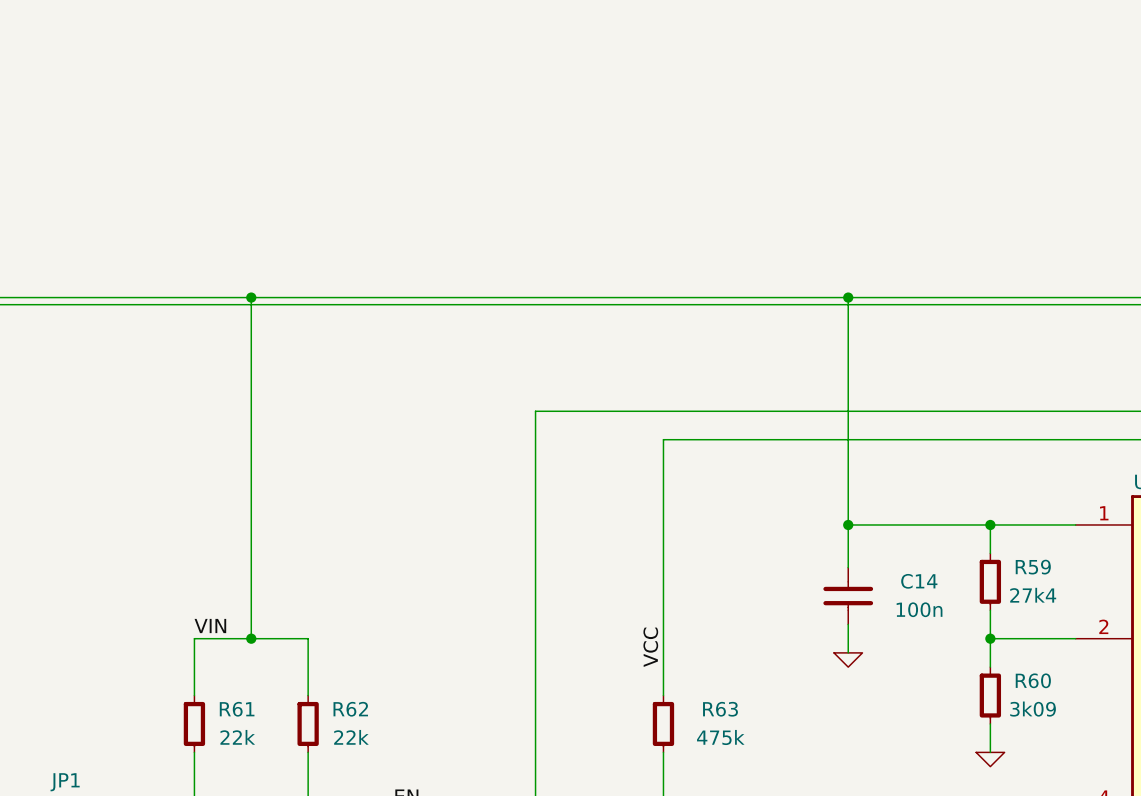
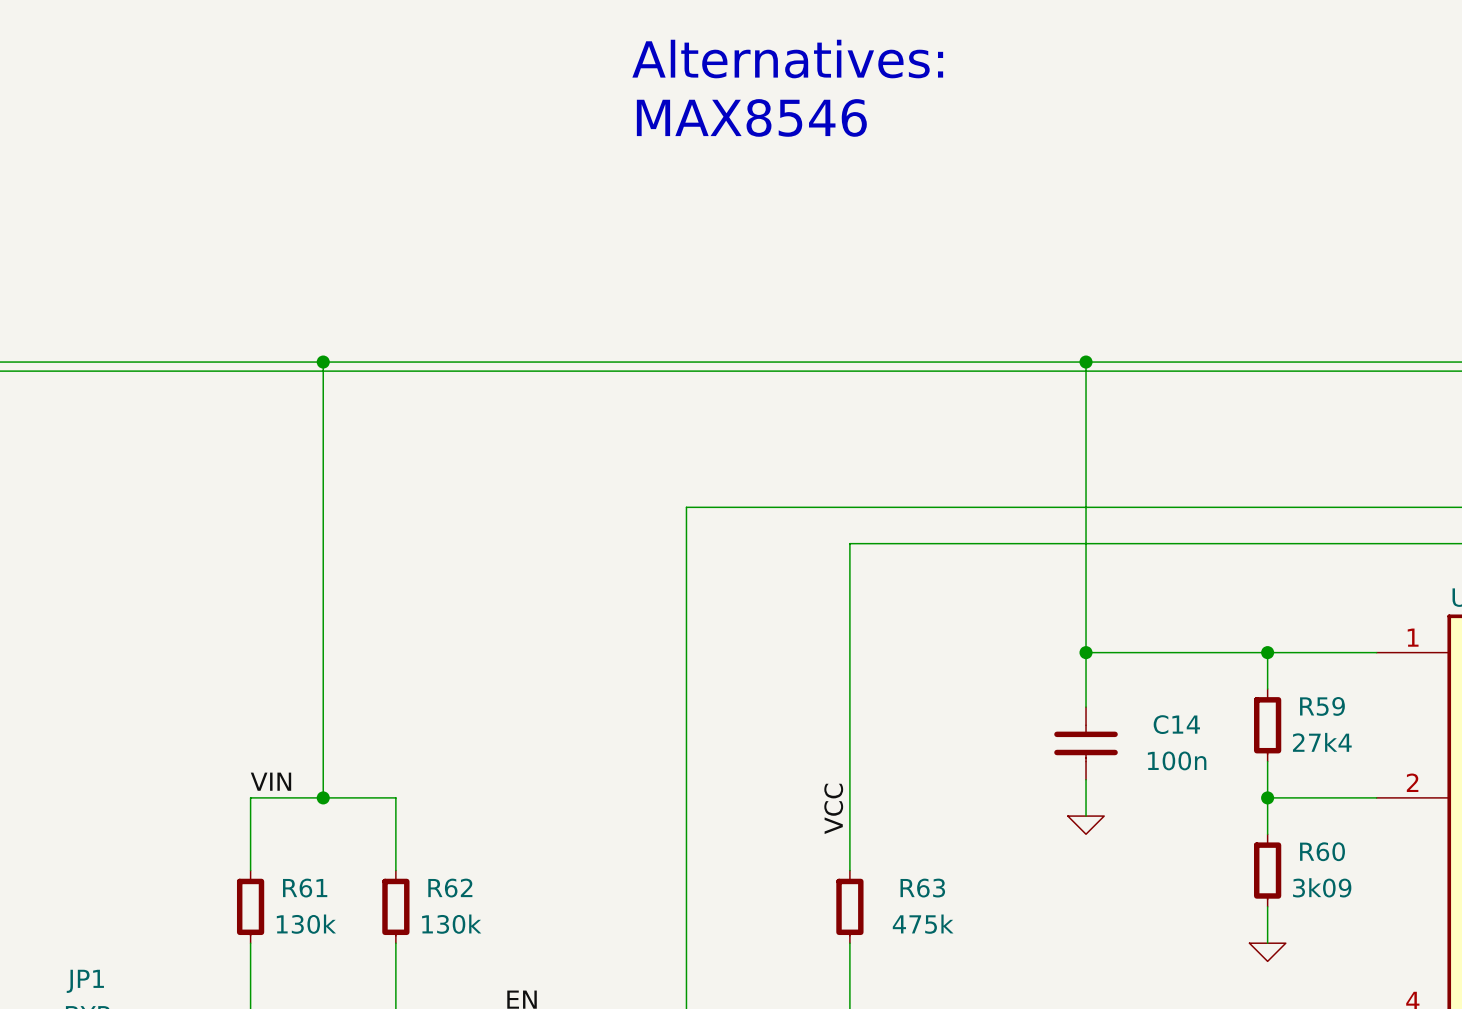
text: none -> Alternatives: (787, 59)
text: none -> MAX8546 (751, 117)
R61 value: 22k (237, 737) -> 130k (306, 924)
R62 value: 22k (351, 737) -> 130k (451, 924)

